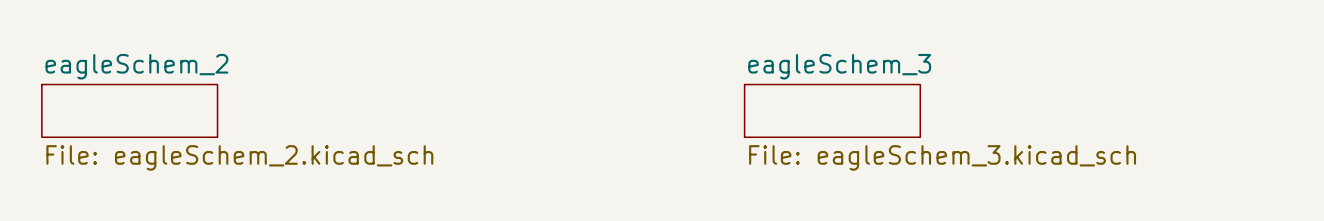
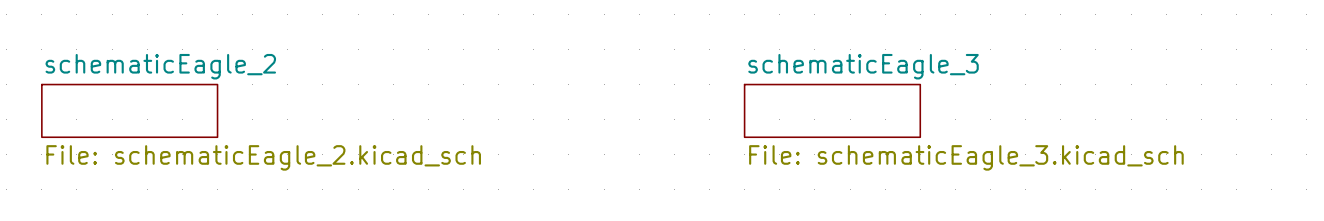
sheet eagleSchem_2 name: eagleSchem_2 (136, 66) -> schematicEagle_2 (160, 66)
sheet eagleSchem_3 name: eagleSchem_3 (839, 66) -> schematicEagle_3 (863, 66)
sheet eagleSchem_2 value: File: eagleSchem_2.kicad_sch (239, 157) -> File: schematicEagle_2.kicad_sch (263, 157)
sheet eagleSchem_3 value: File: eagleSchem_3.kicad_sch (942, 157) -> File: schematicEagle_3.kicad_sch (966, 157)

